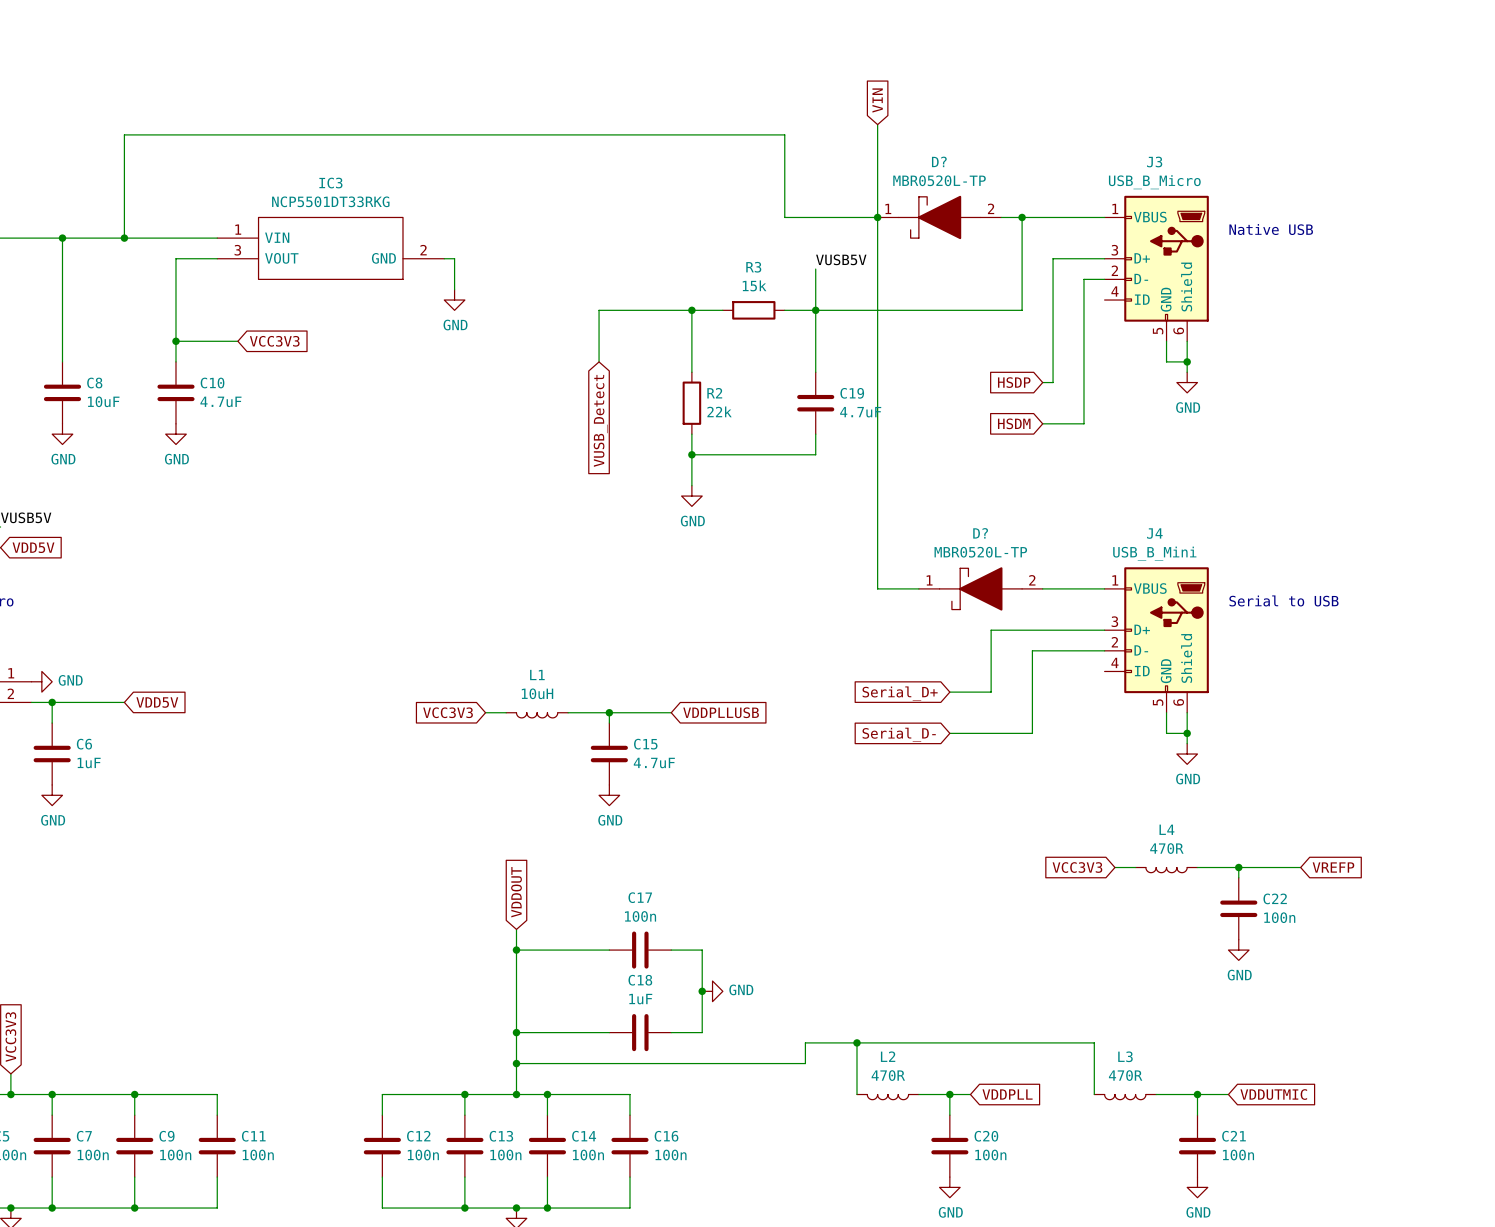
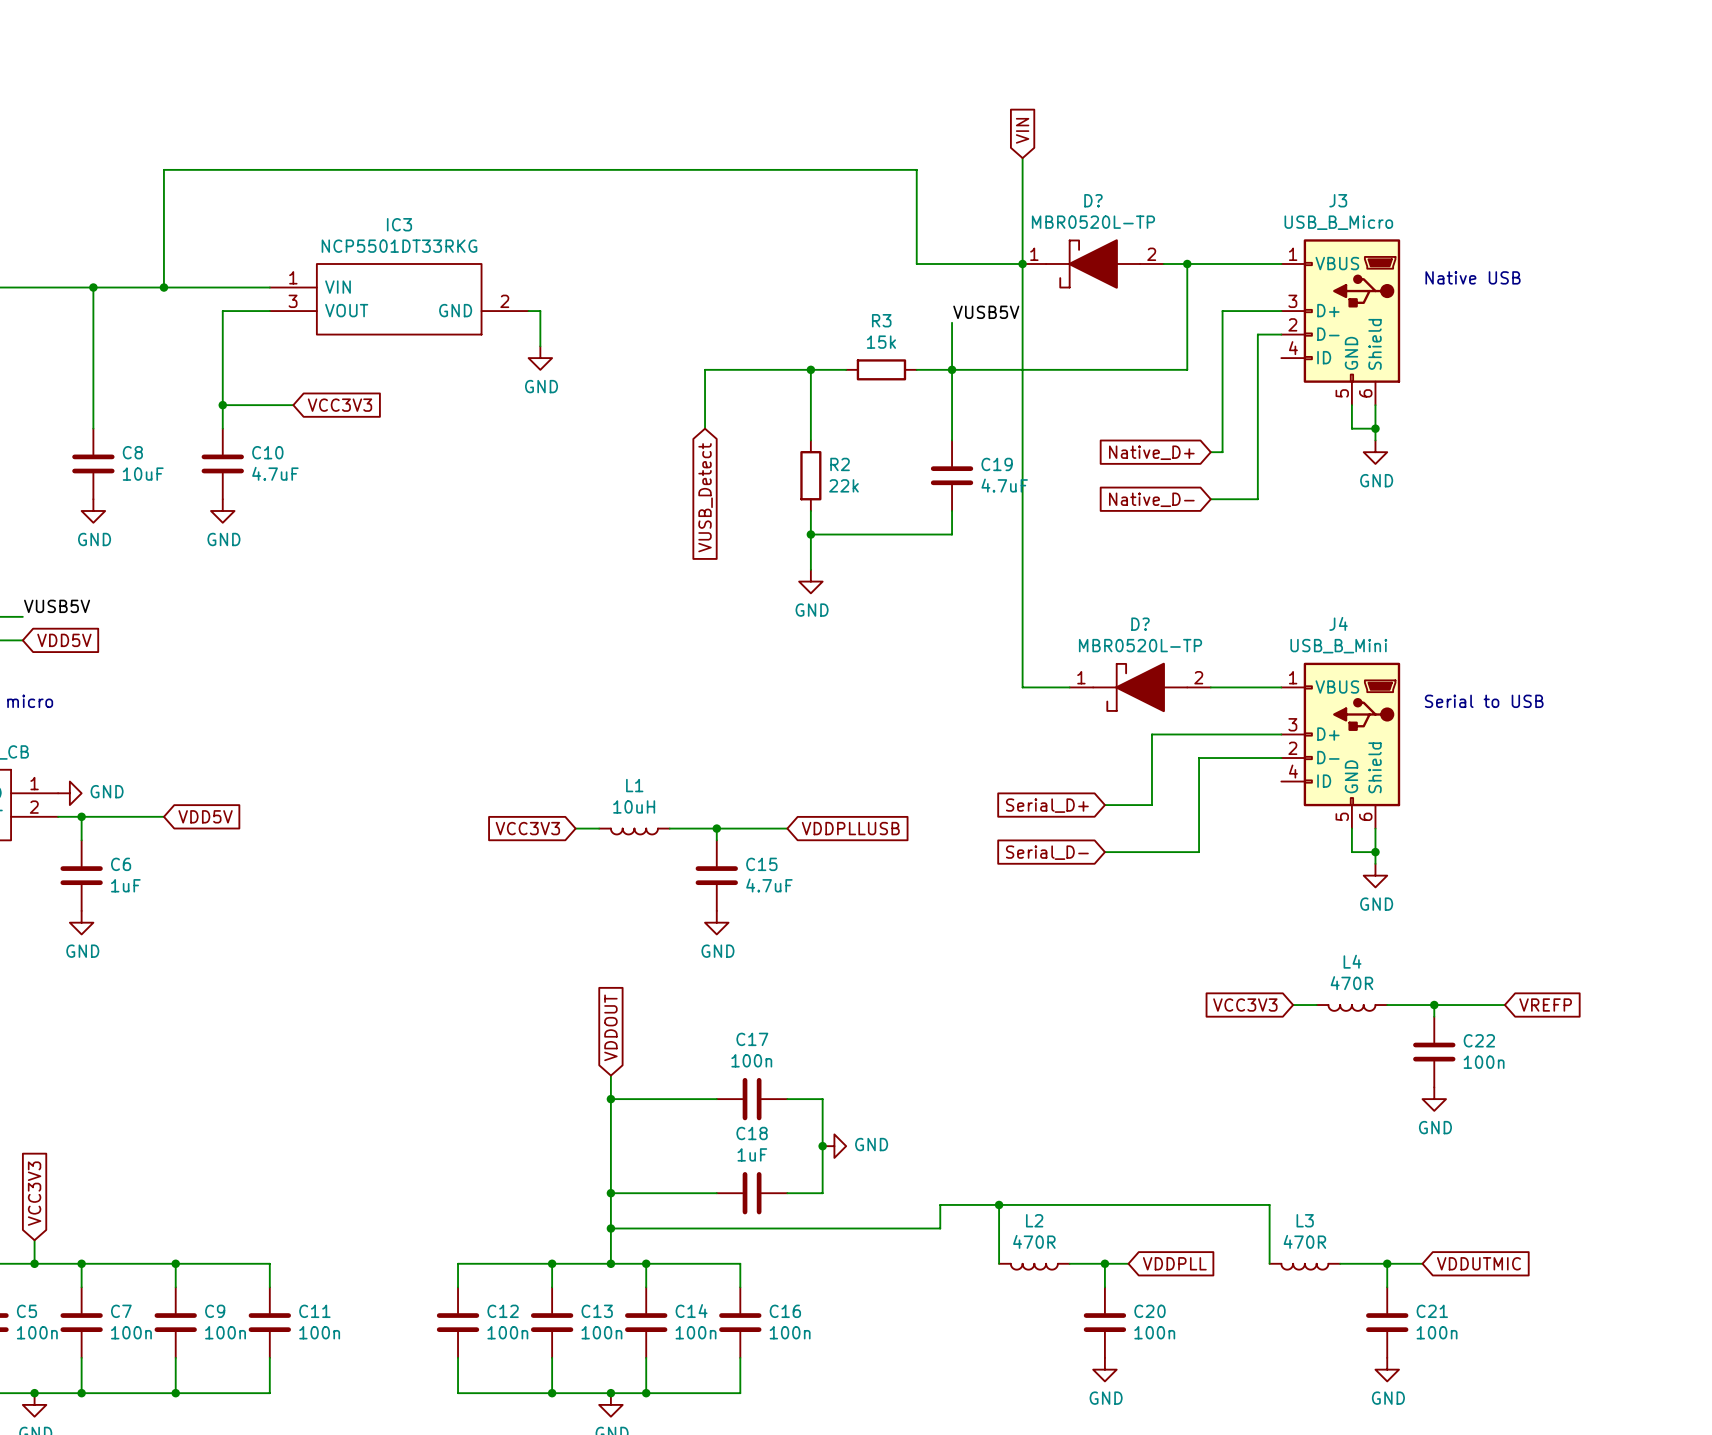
global label: HSDP (1014, 382) -> Native_D+ (1151, 452)
global label: HSDM (1014, 423) -> Native_D- (1151, 499)

